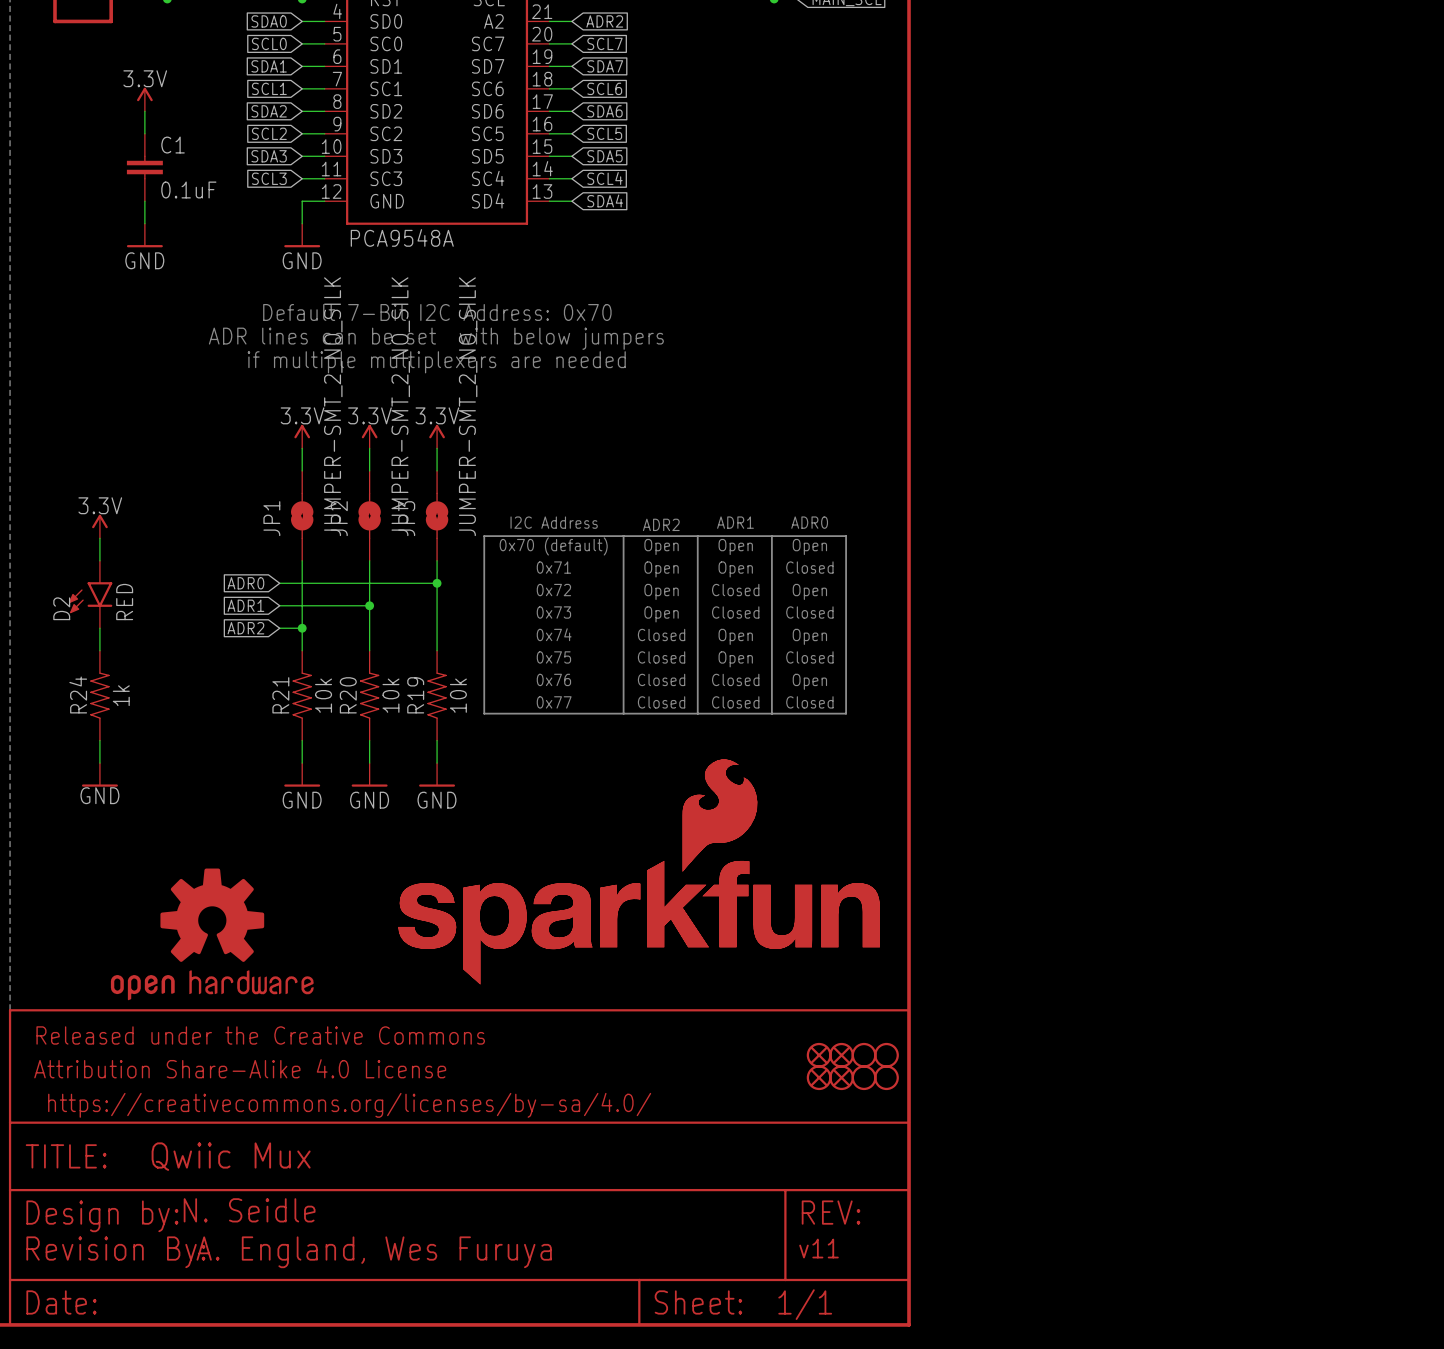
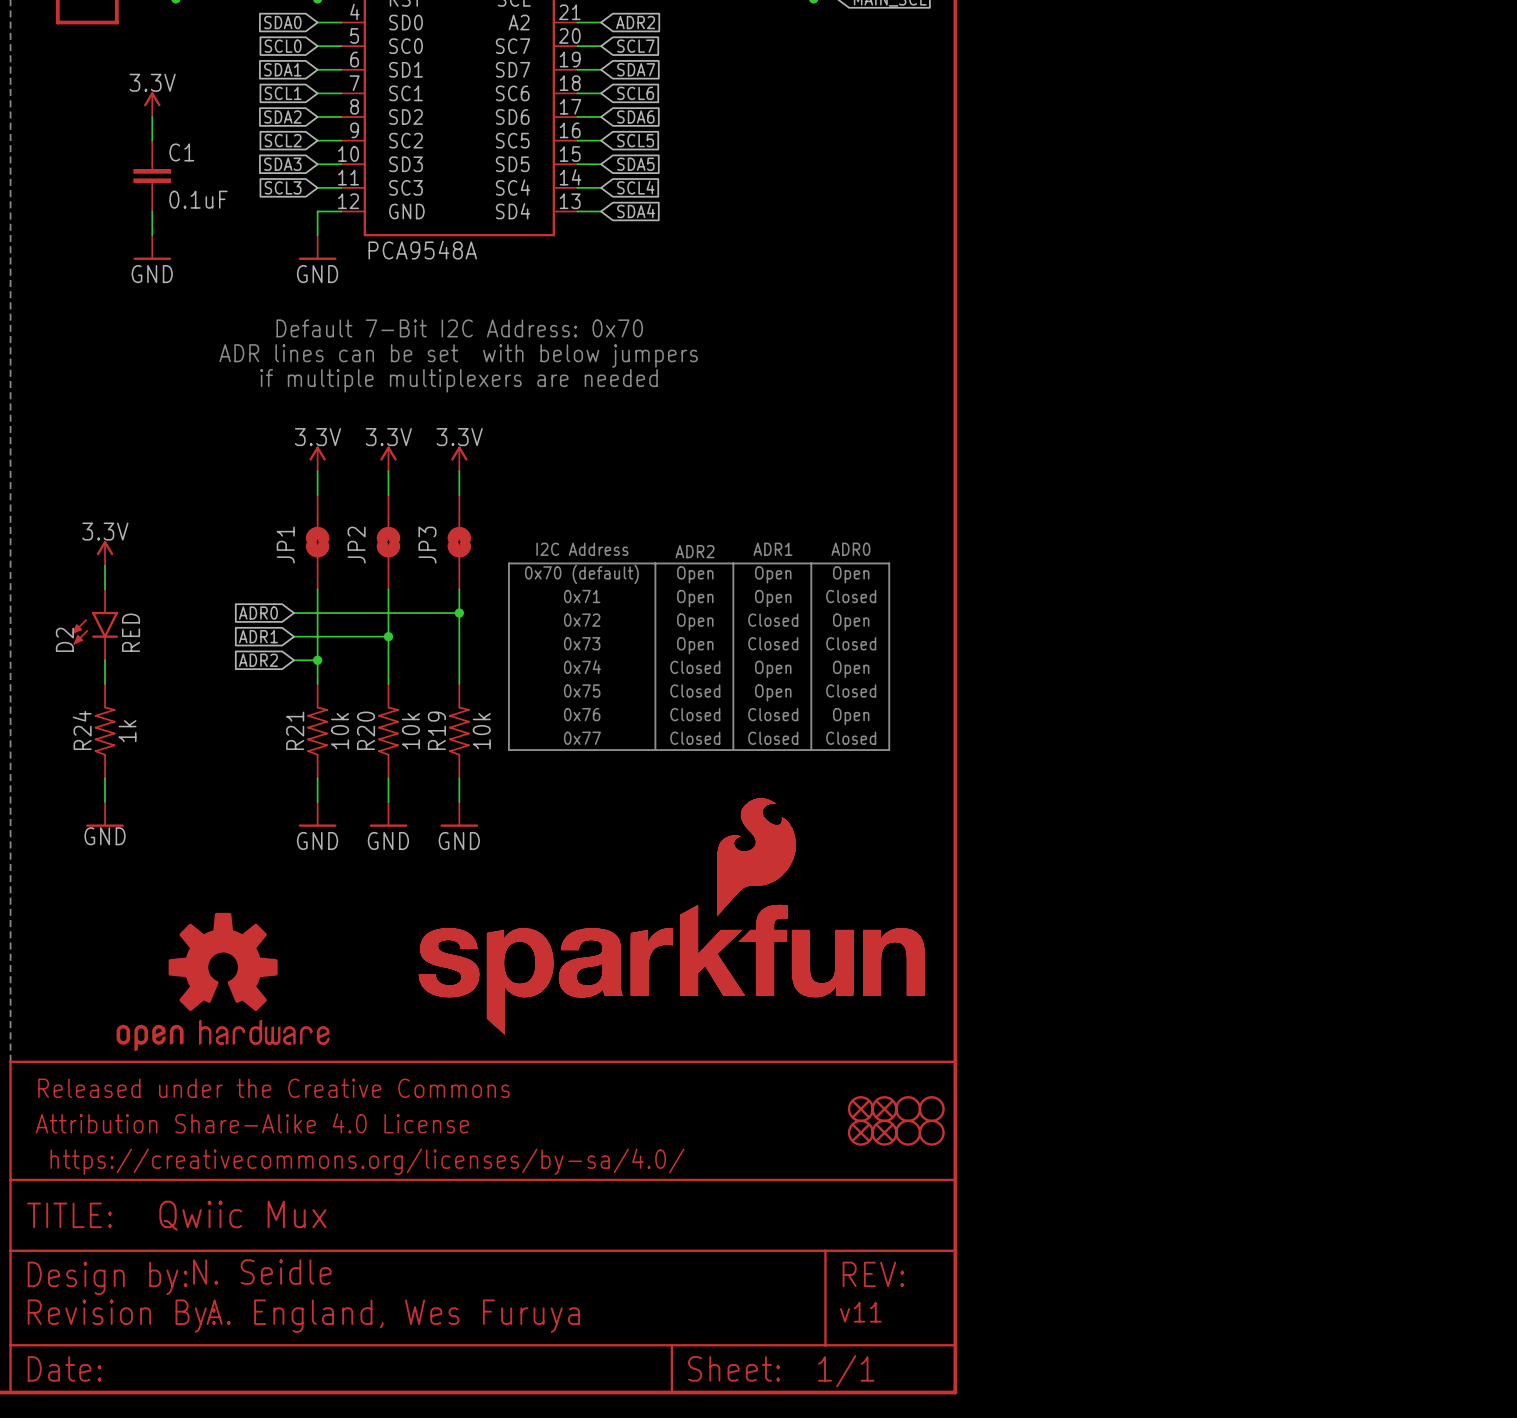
JP1 value: JUMPER-SMT_2_NO_SILK (333, 406) -> none
JP2 value: JUMPER-SMT_2_NO_SILK (400, 406) -> none
JP3 value: JUMPER-SMT_2_NO_SILK (468, 406) -> none

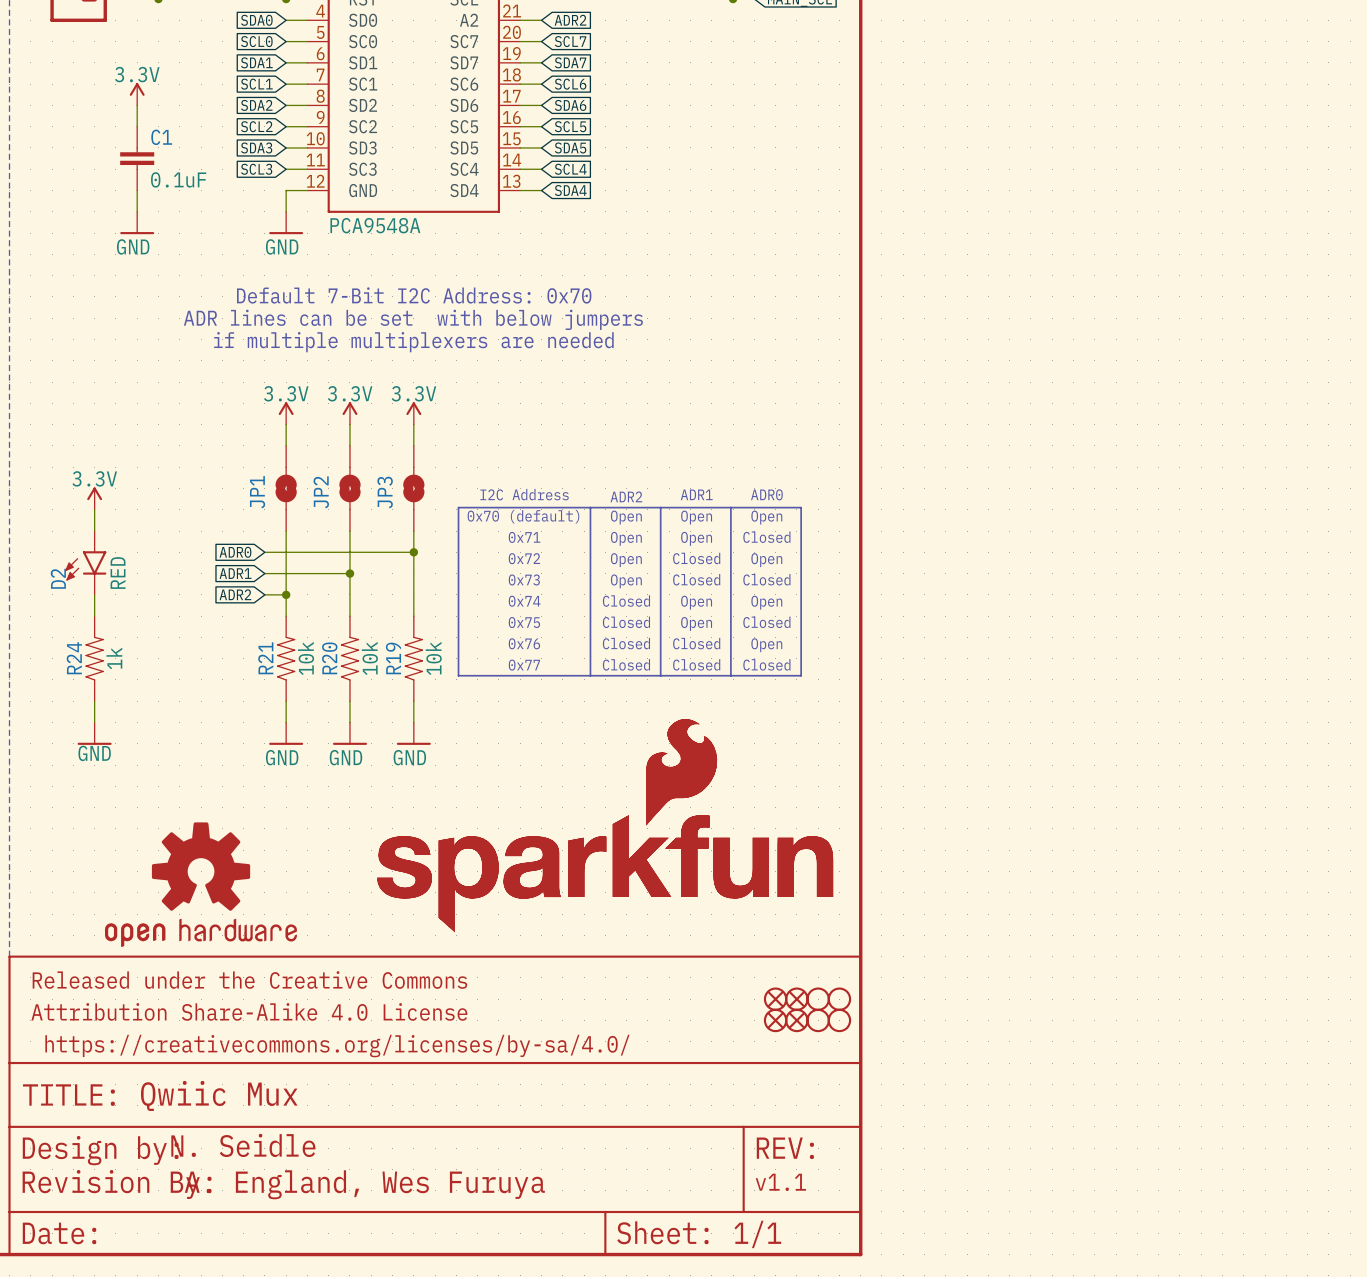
text: v11 (860, 1312) -> v1.1 (780, 1182)

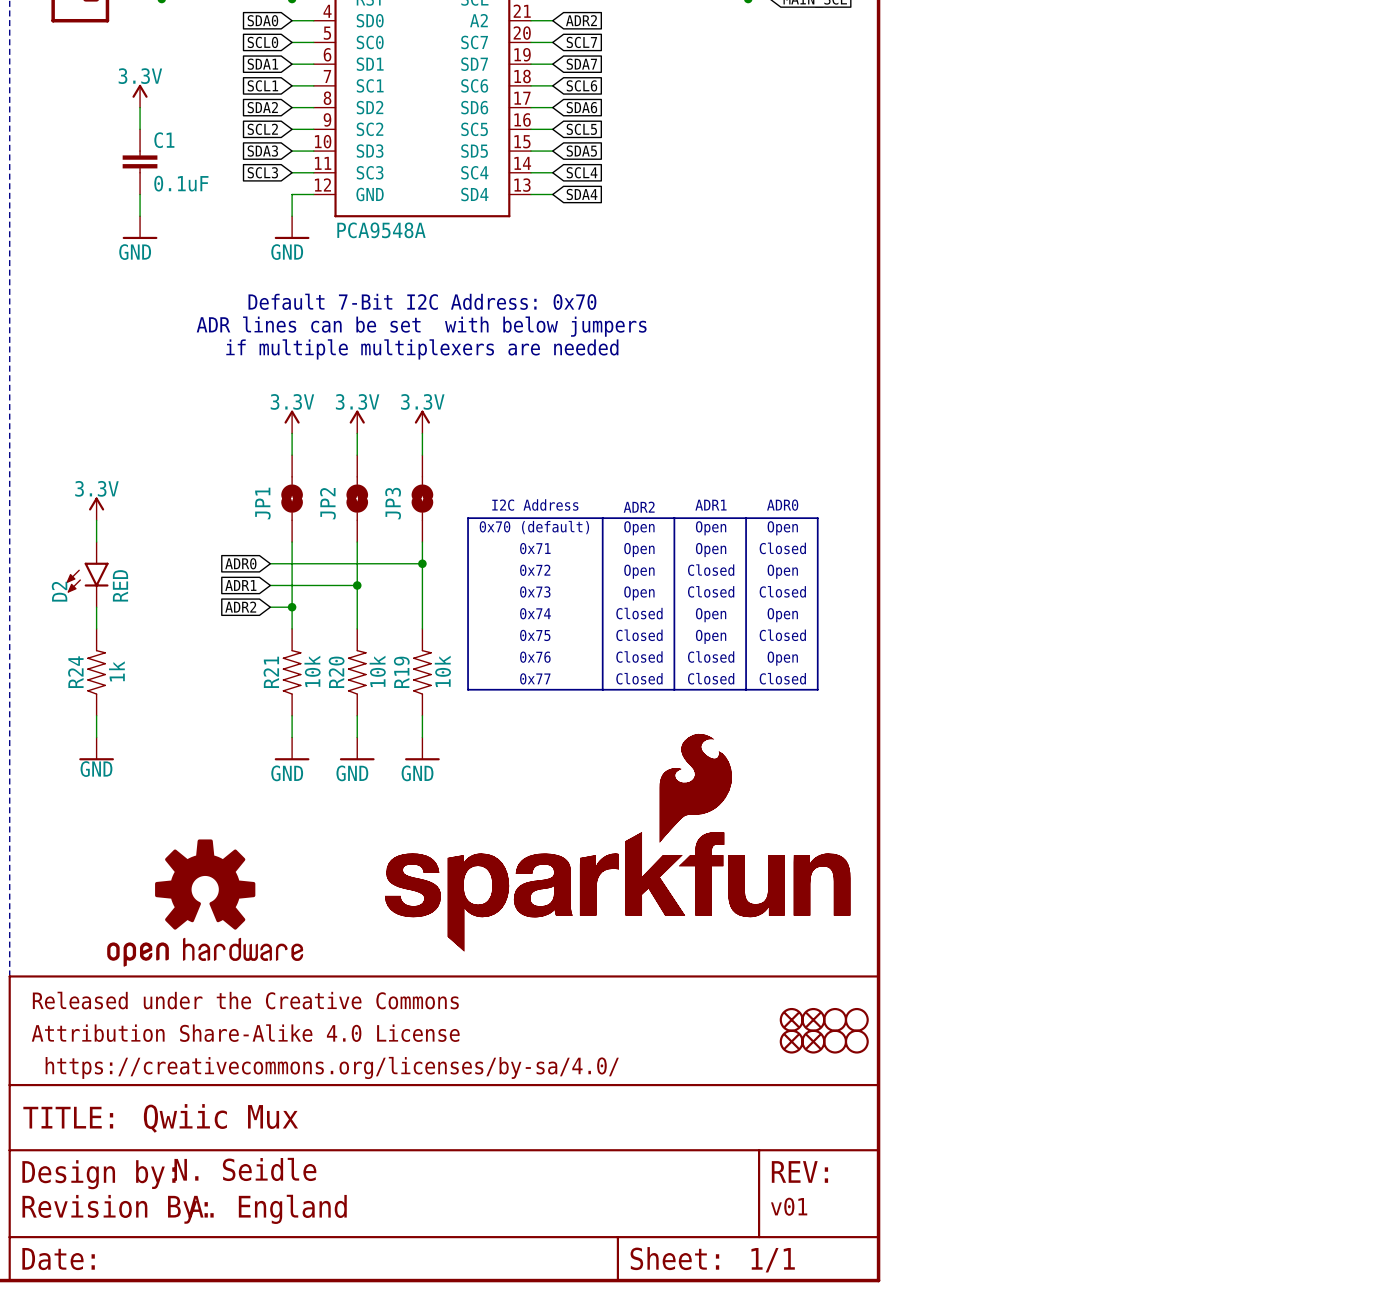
text: v1.1 (780, 1182) -> v01 (789, 1206)
text: A. England, Wes Furuya (364, 1184) -> A. England (267, 1209)

